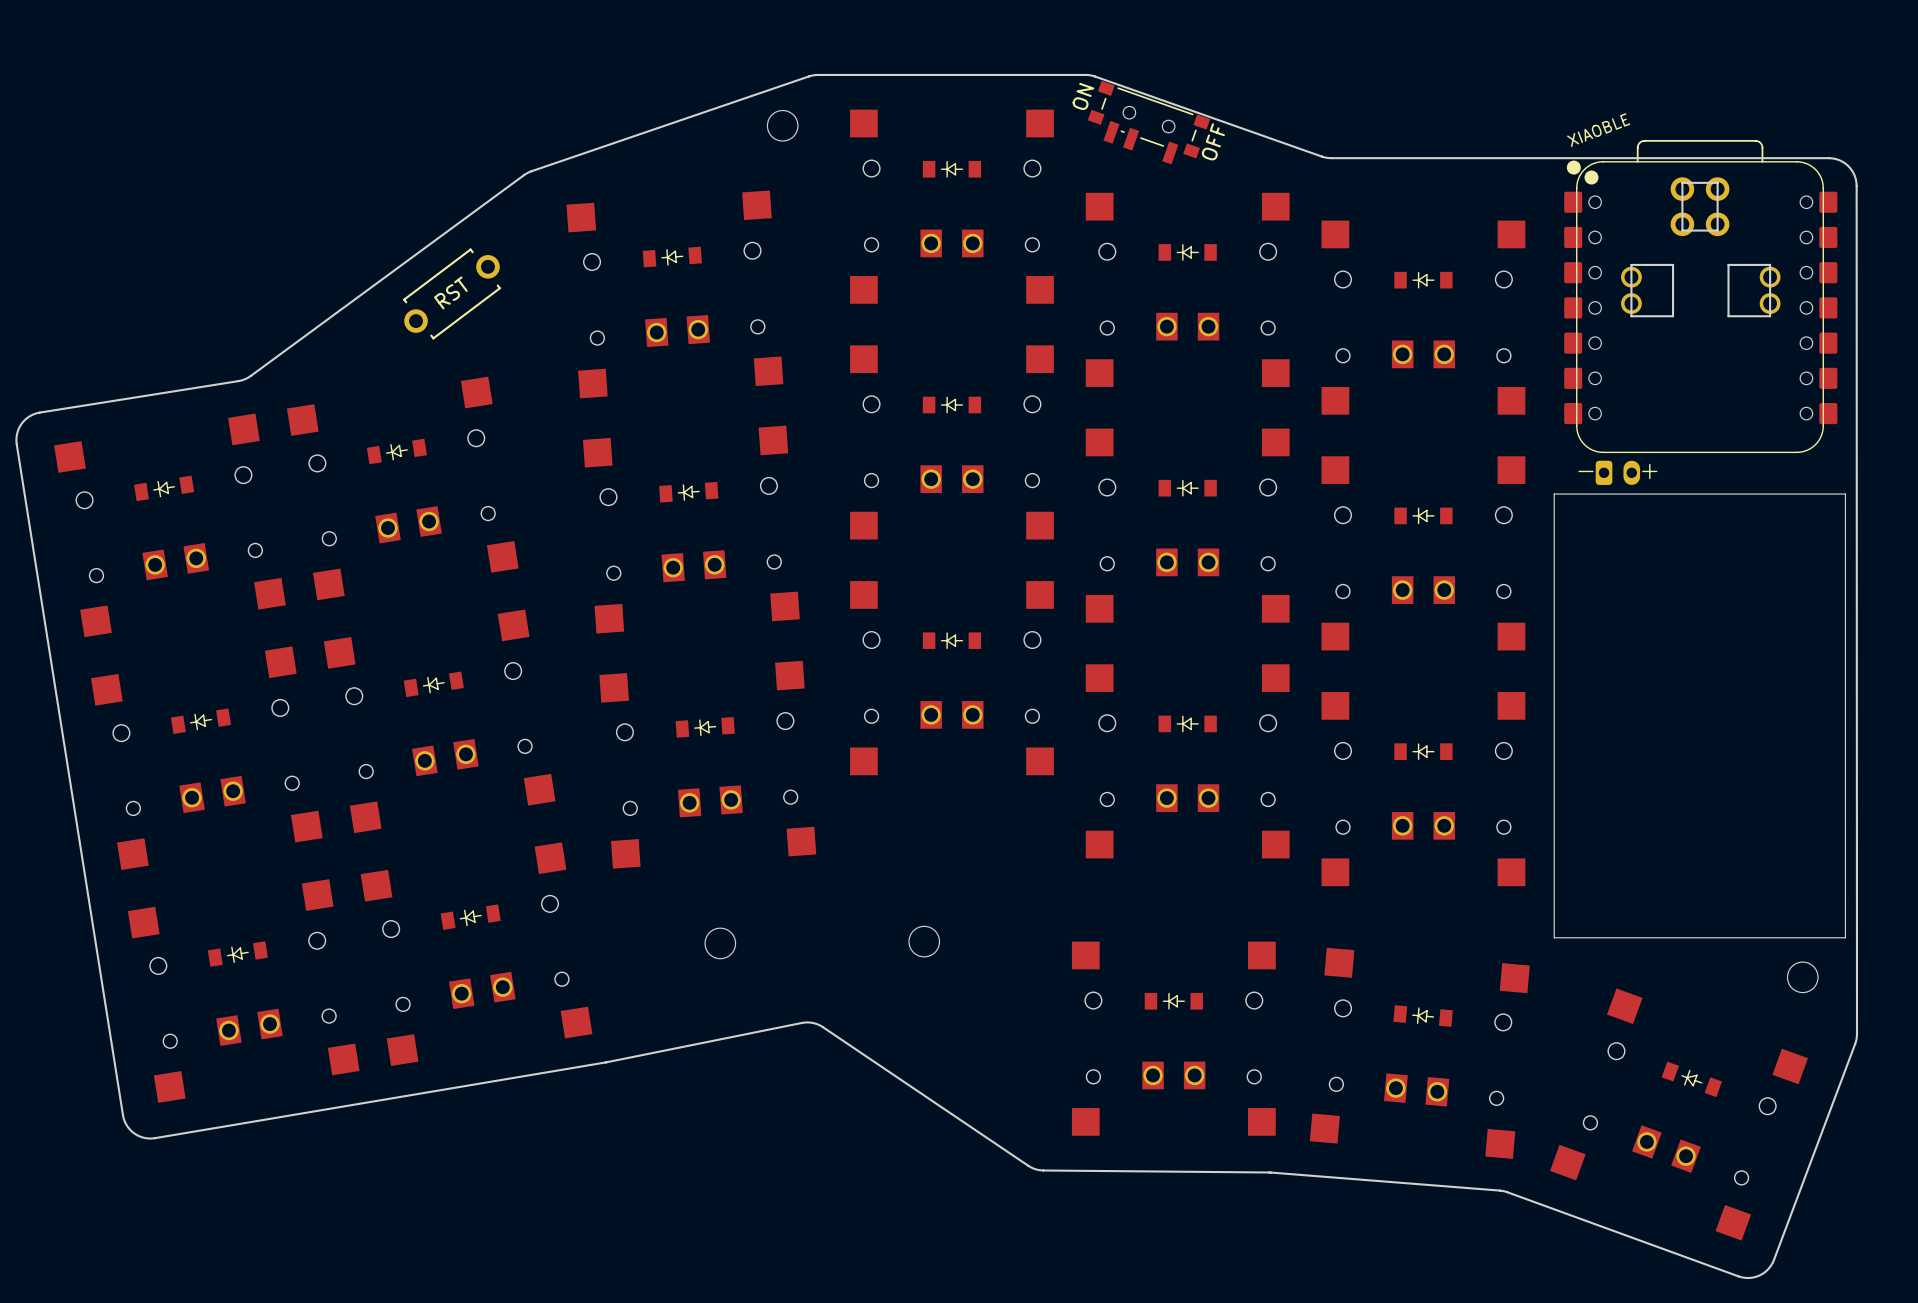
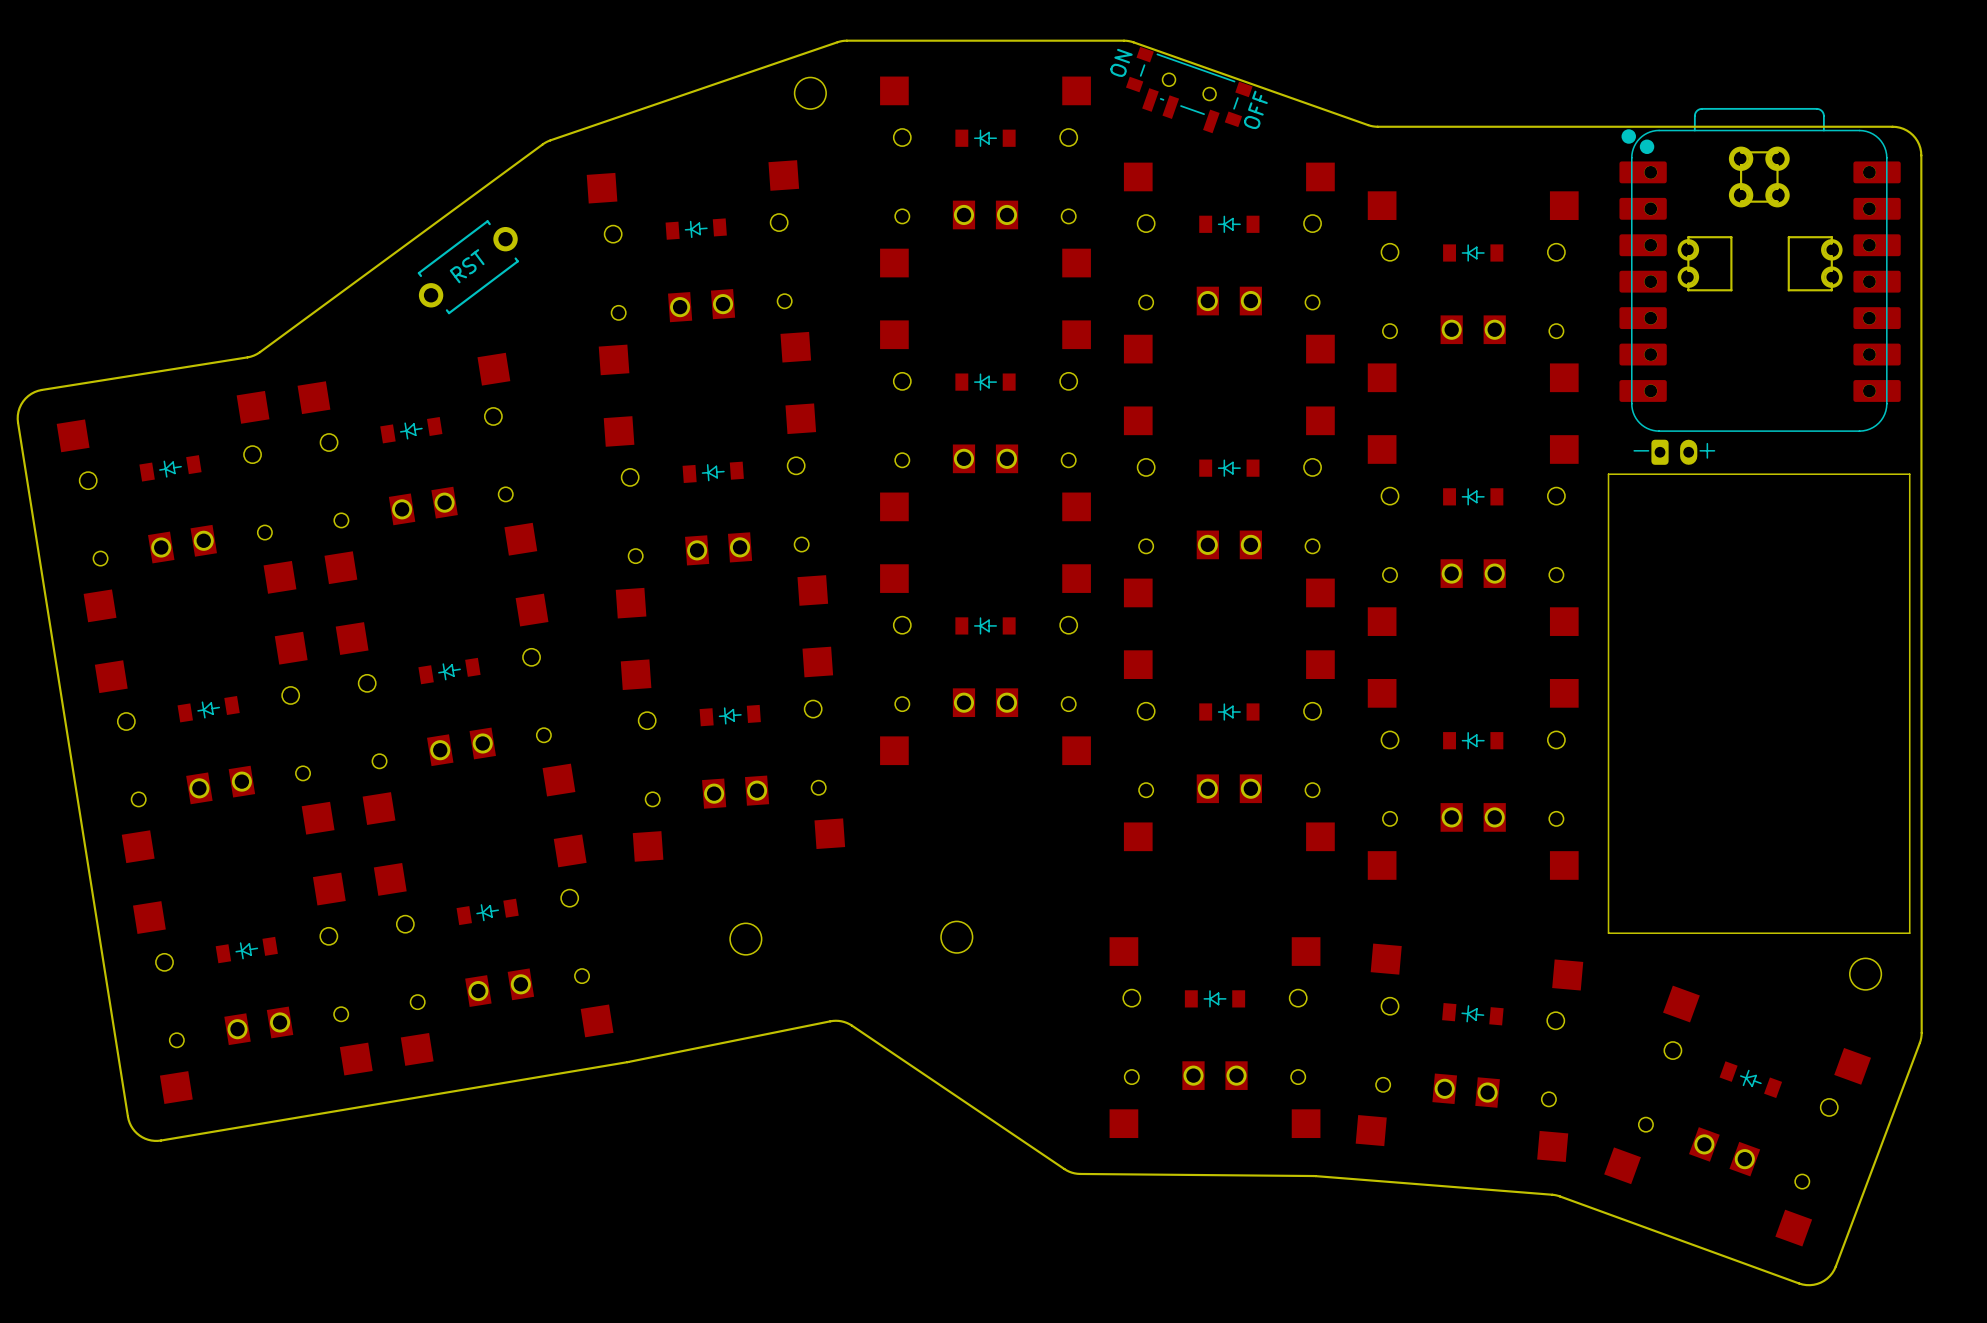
XIAOBLE: (1700, 296) -> none
part: none -> (1760, 269)

